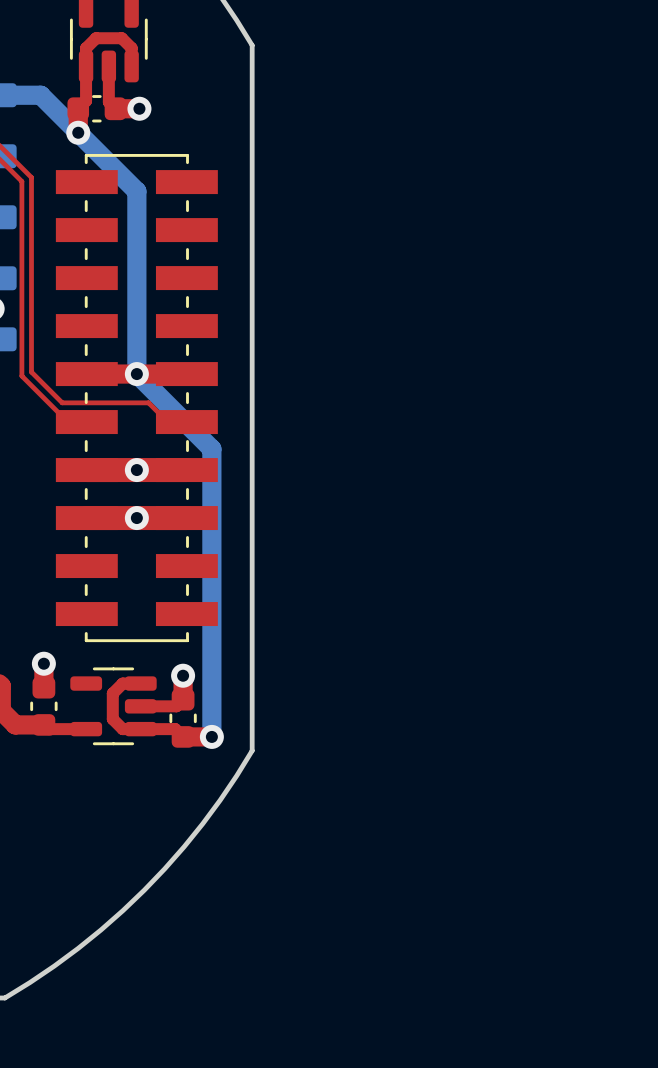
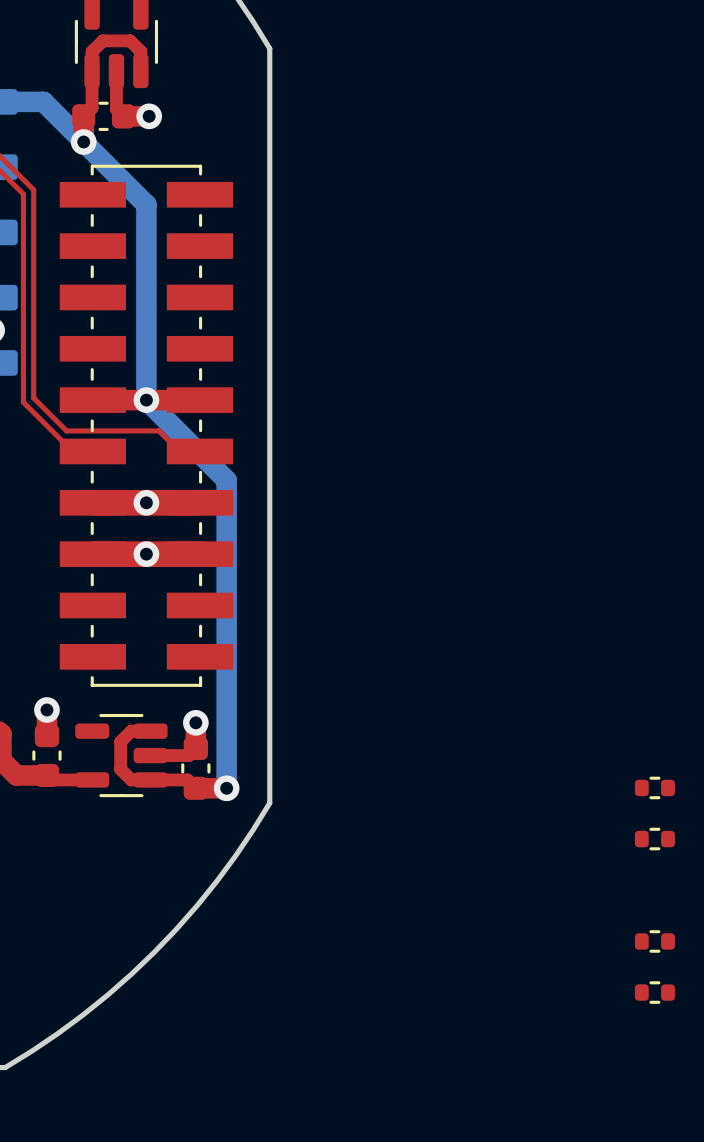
part: none -> (654, 787)
part: none -> (654, 839)
part: none -> (654, 941)
part: none -> (654, 992)

